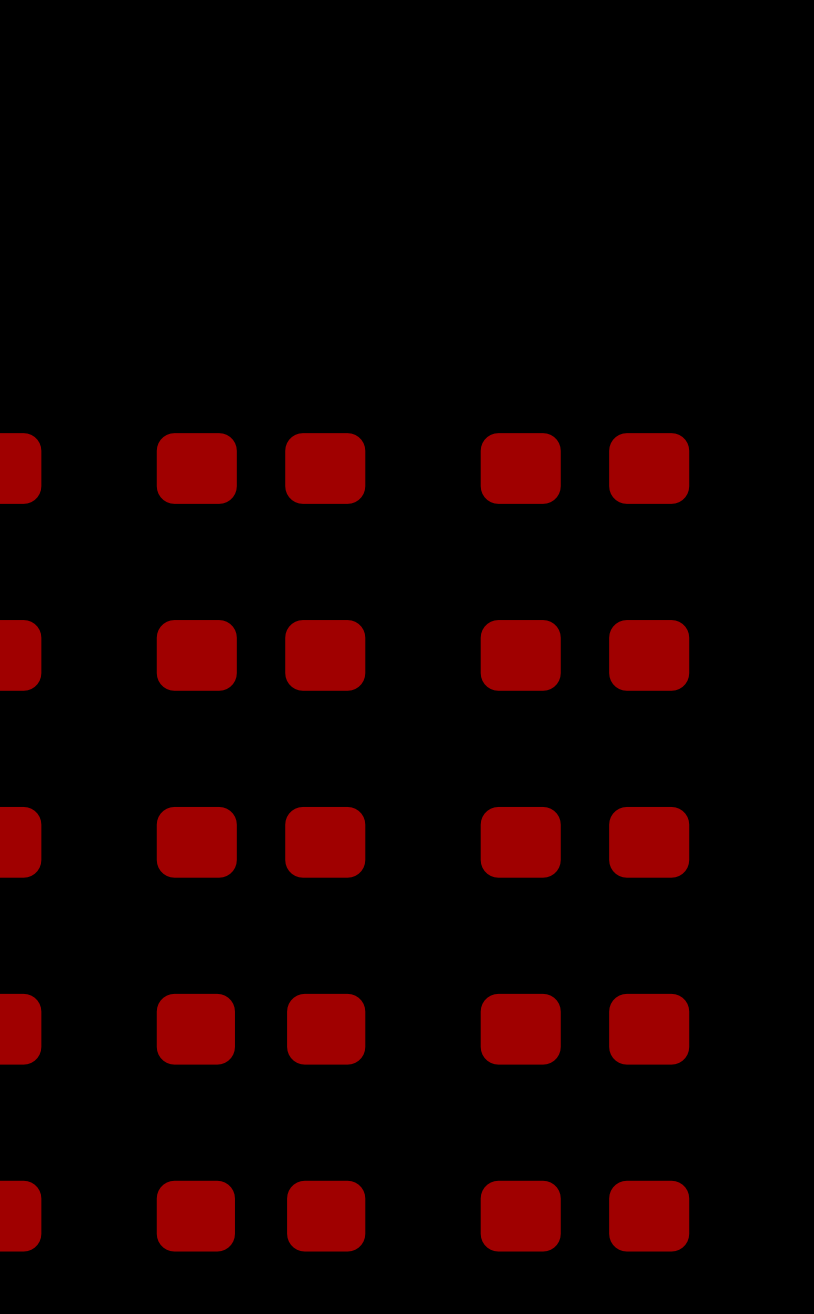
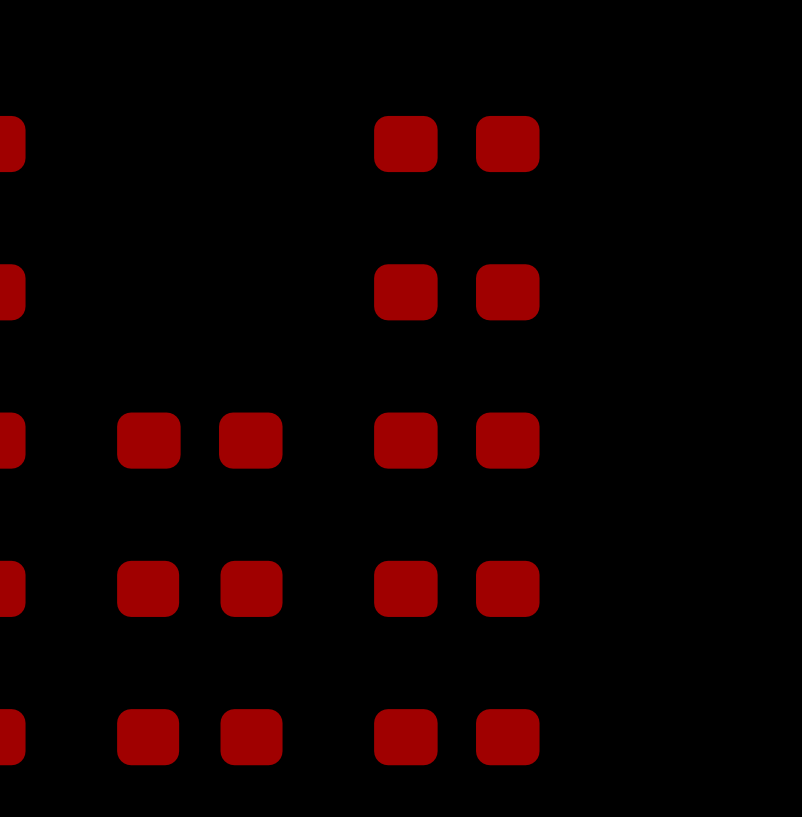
part: (261, 468) -> none
part: (261, 655) -> none

